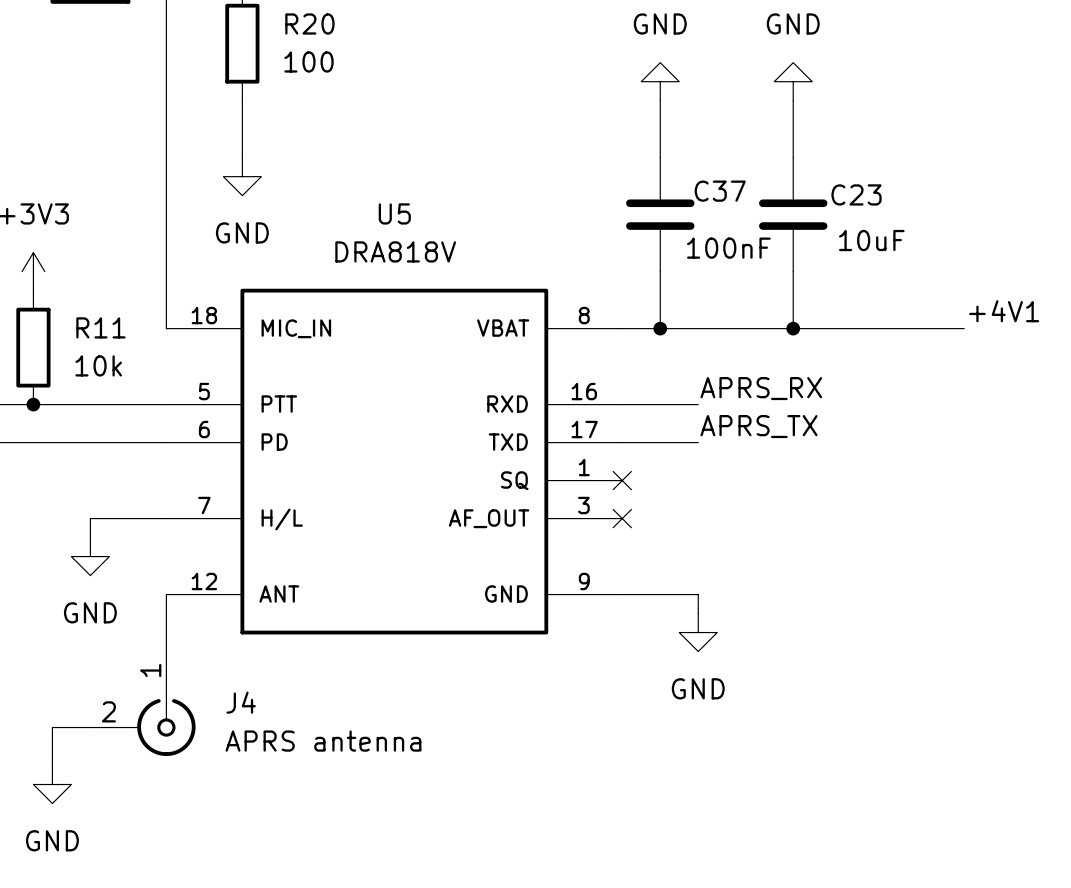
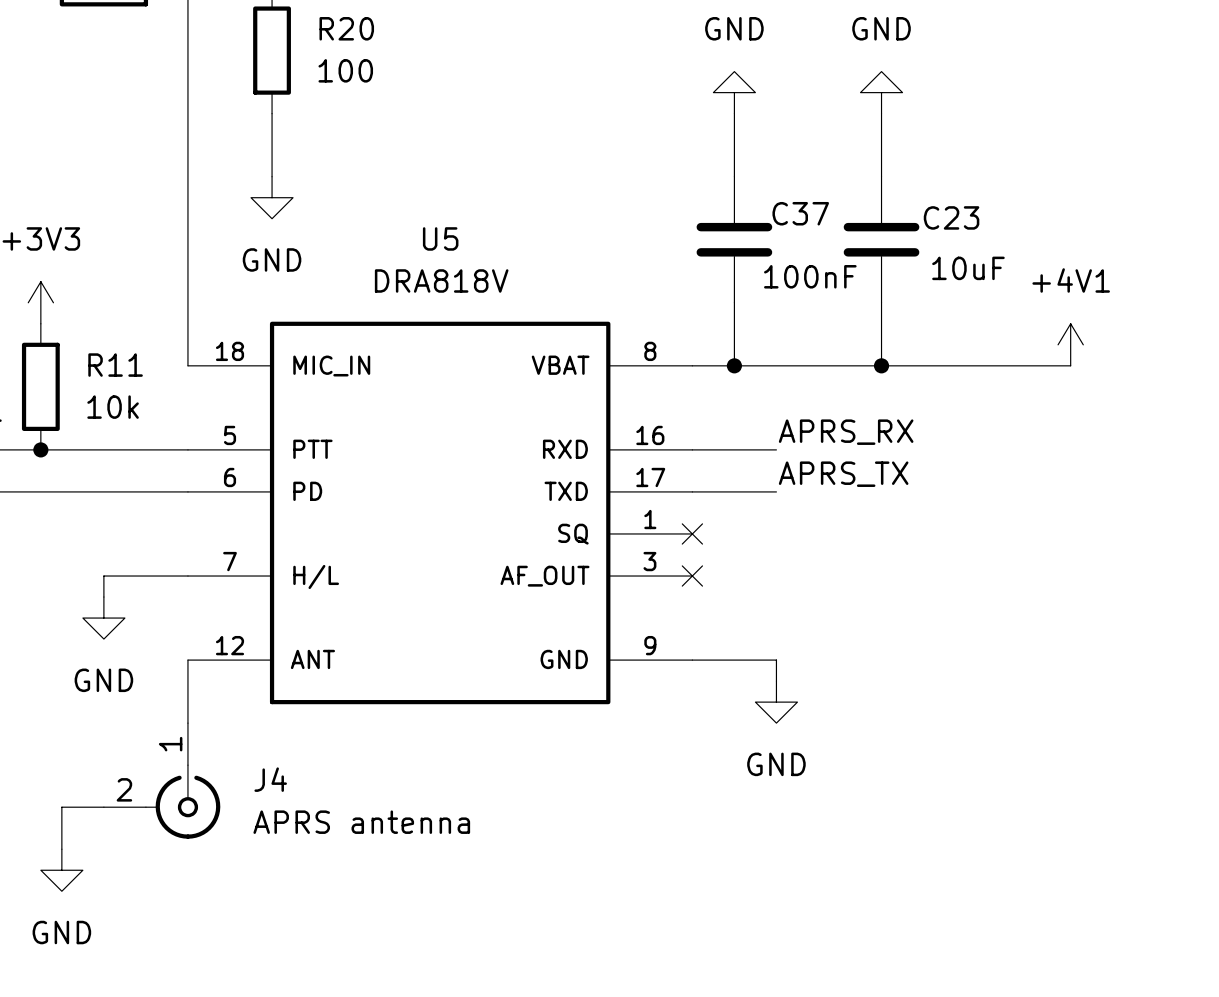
power symbol: none -> +4V1 (1070, 344)
label: +4V1 (1004, 311) -> none

